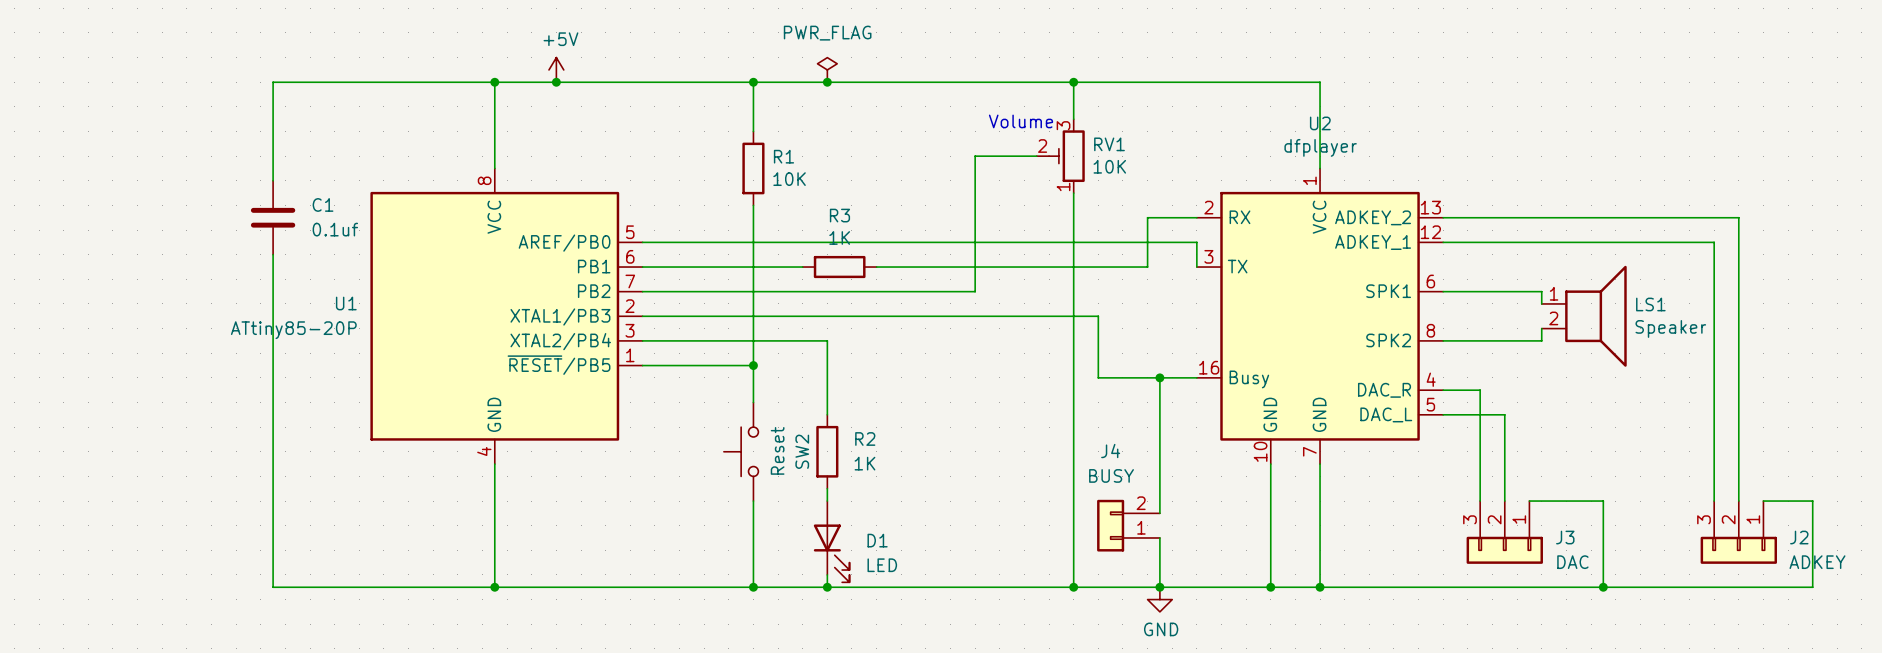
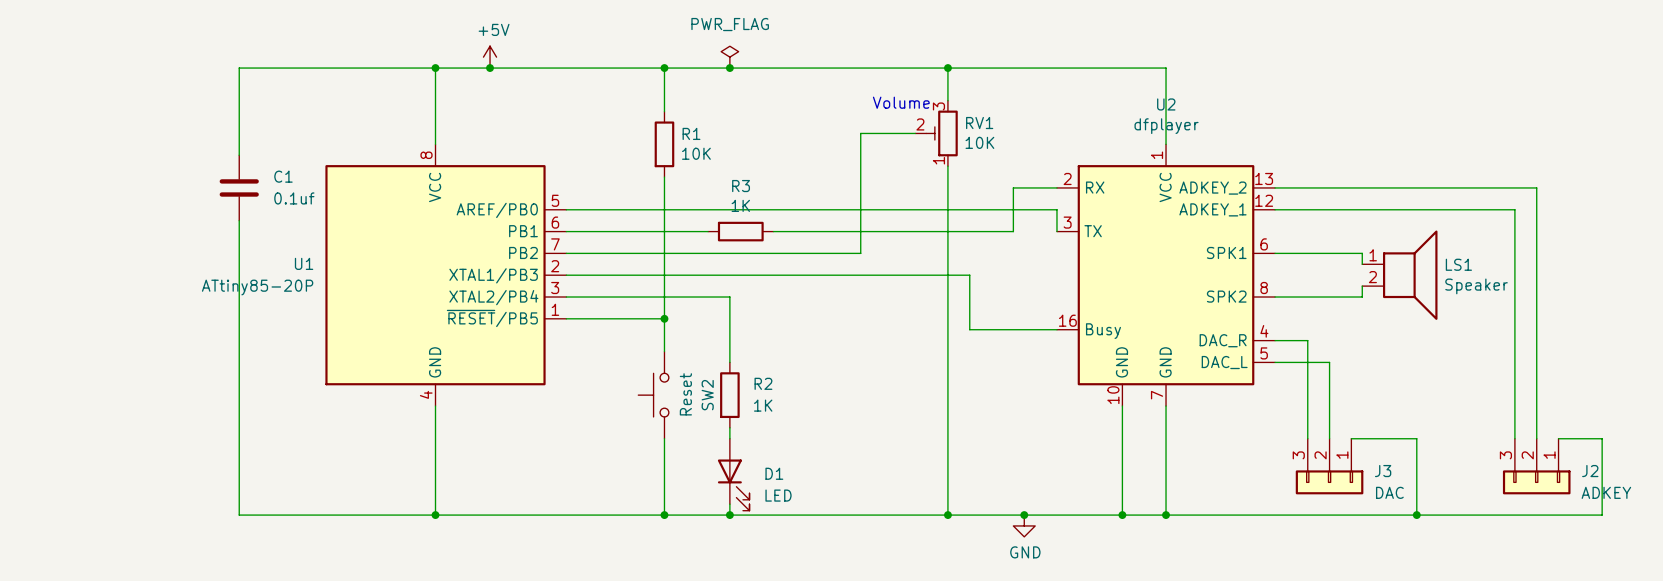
wire: (1159, 377) (1159, 513) -> none
junction: (1159, 377) -> none
J4: BUSY (1128, 525) -> none
wire: (1159, 537) (1159, 587) -> none

